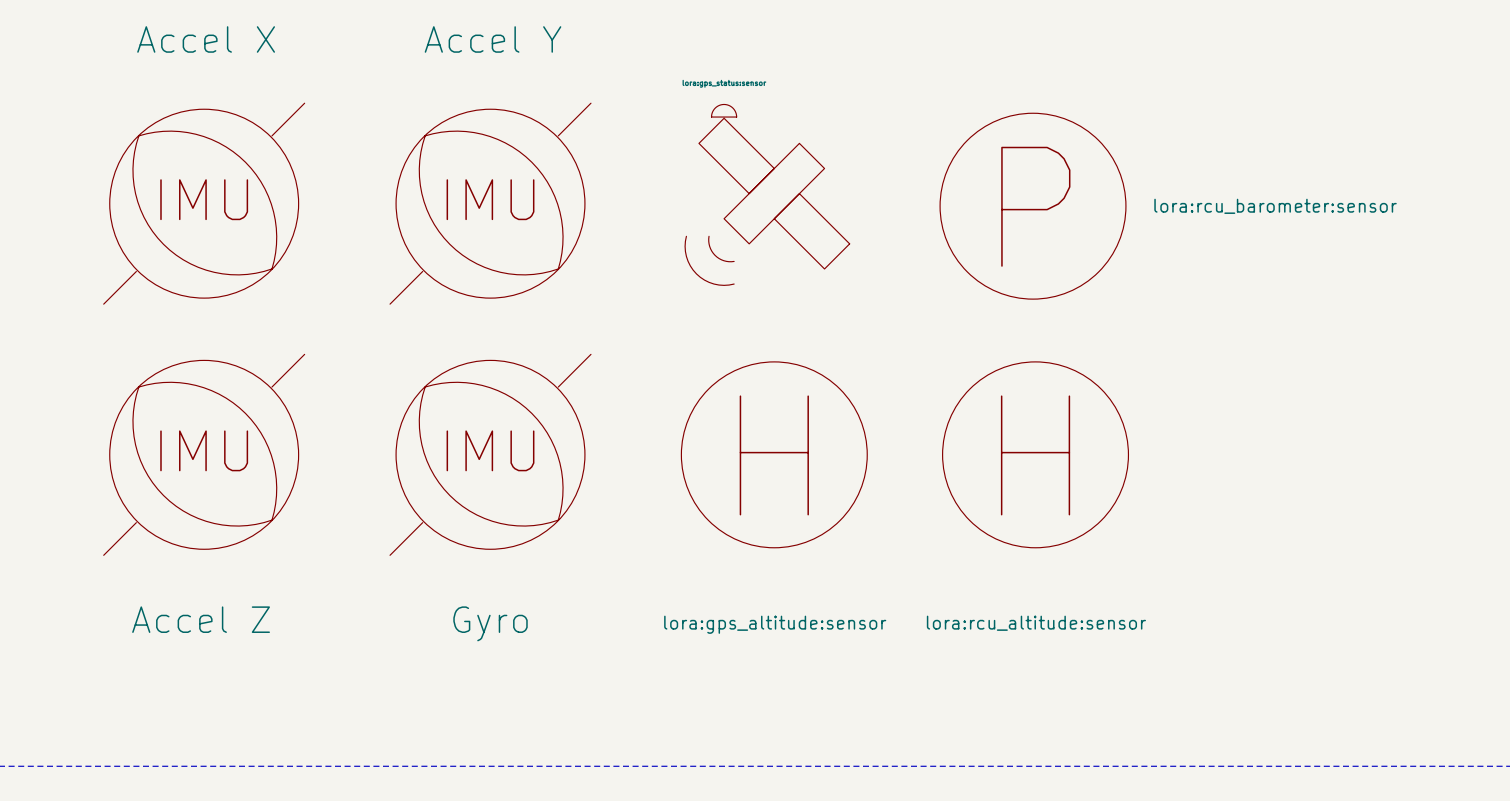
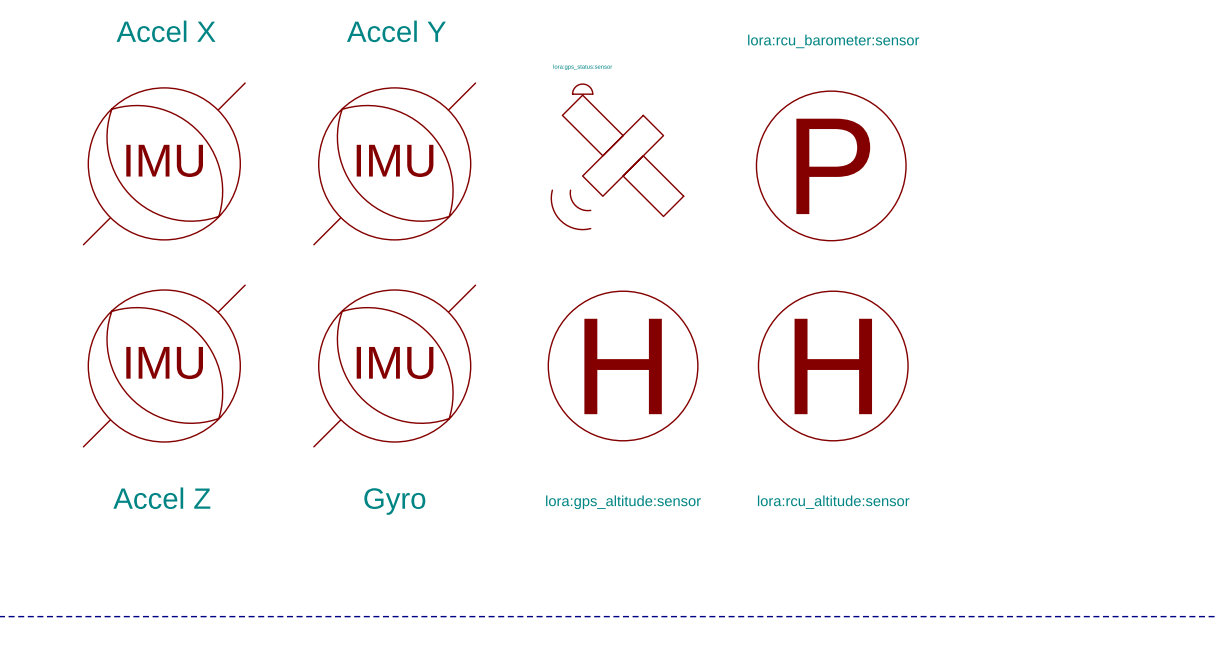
part value position: lora:rcu_barometer:sensor (1275, 206) -> lora:rcu_barometer:sensor (833, 41)

